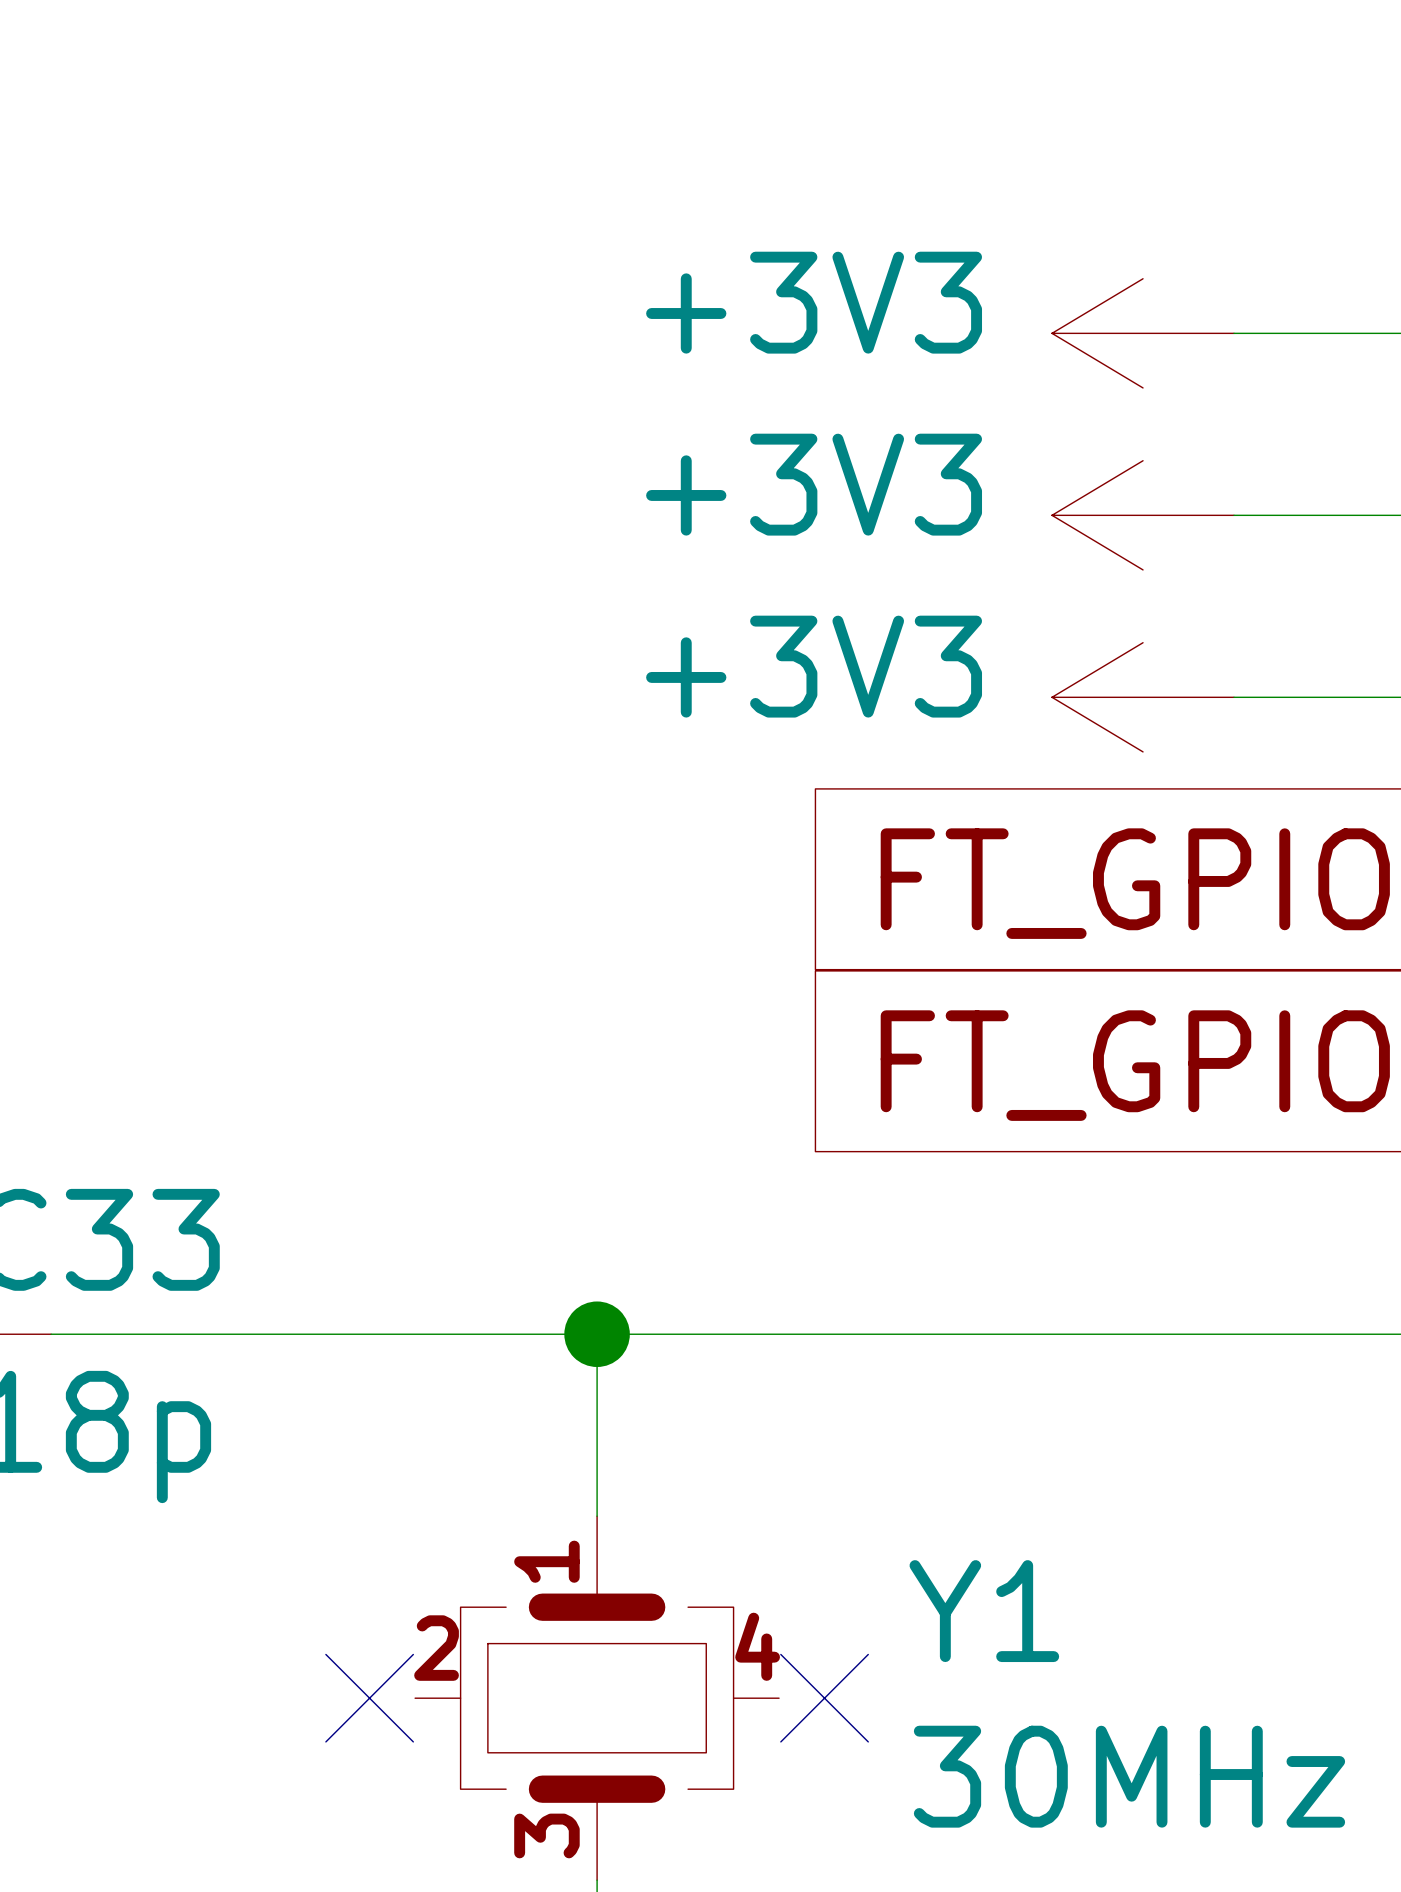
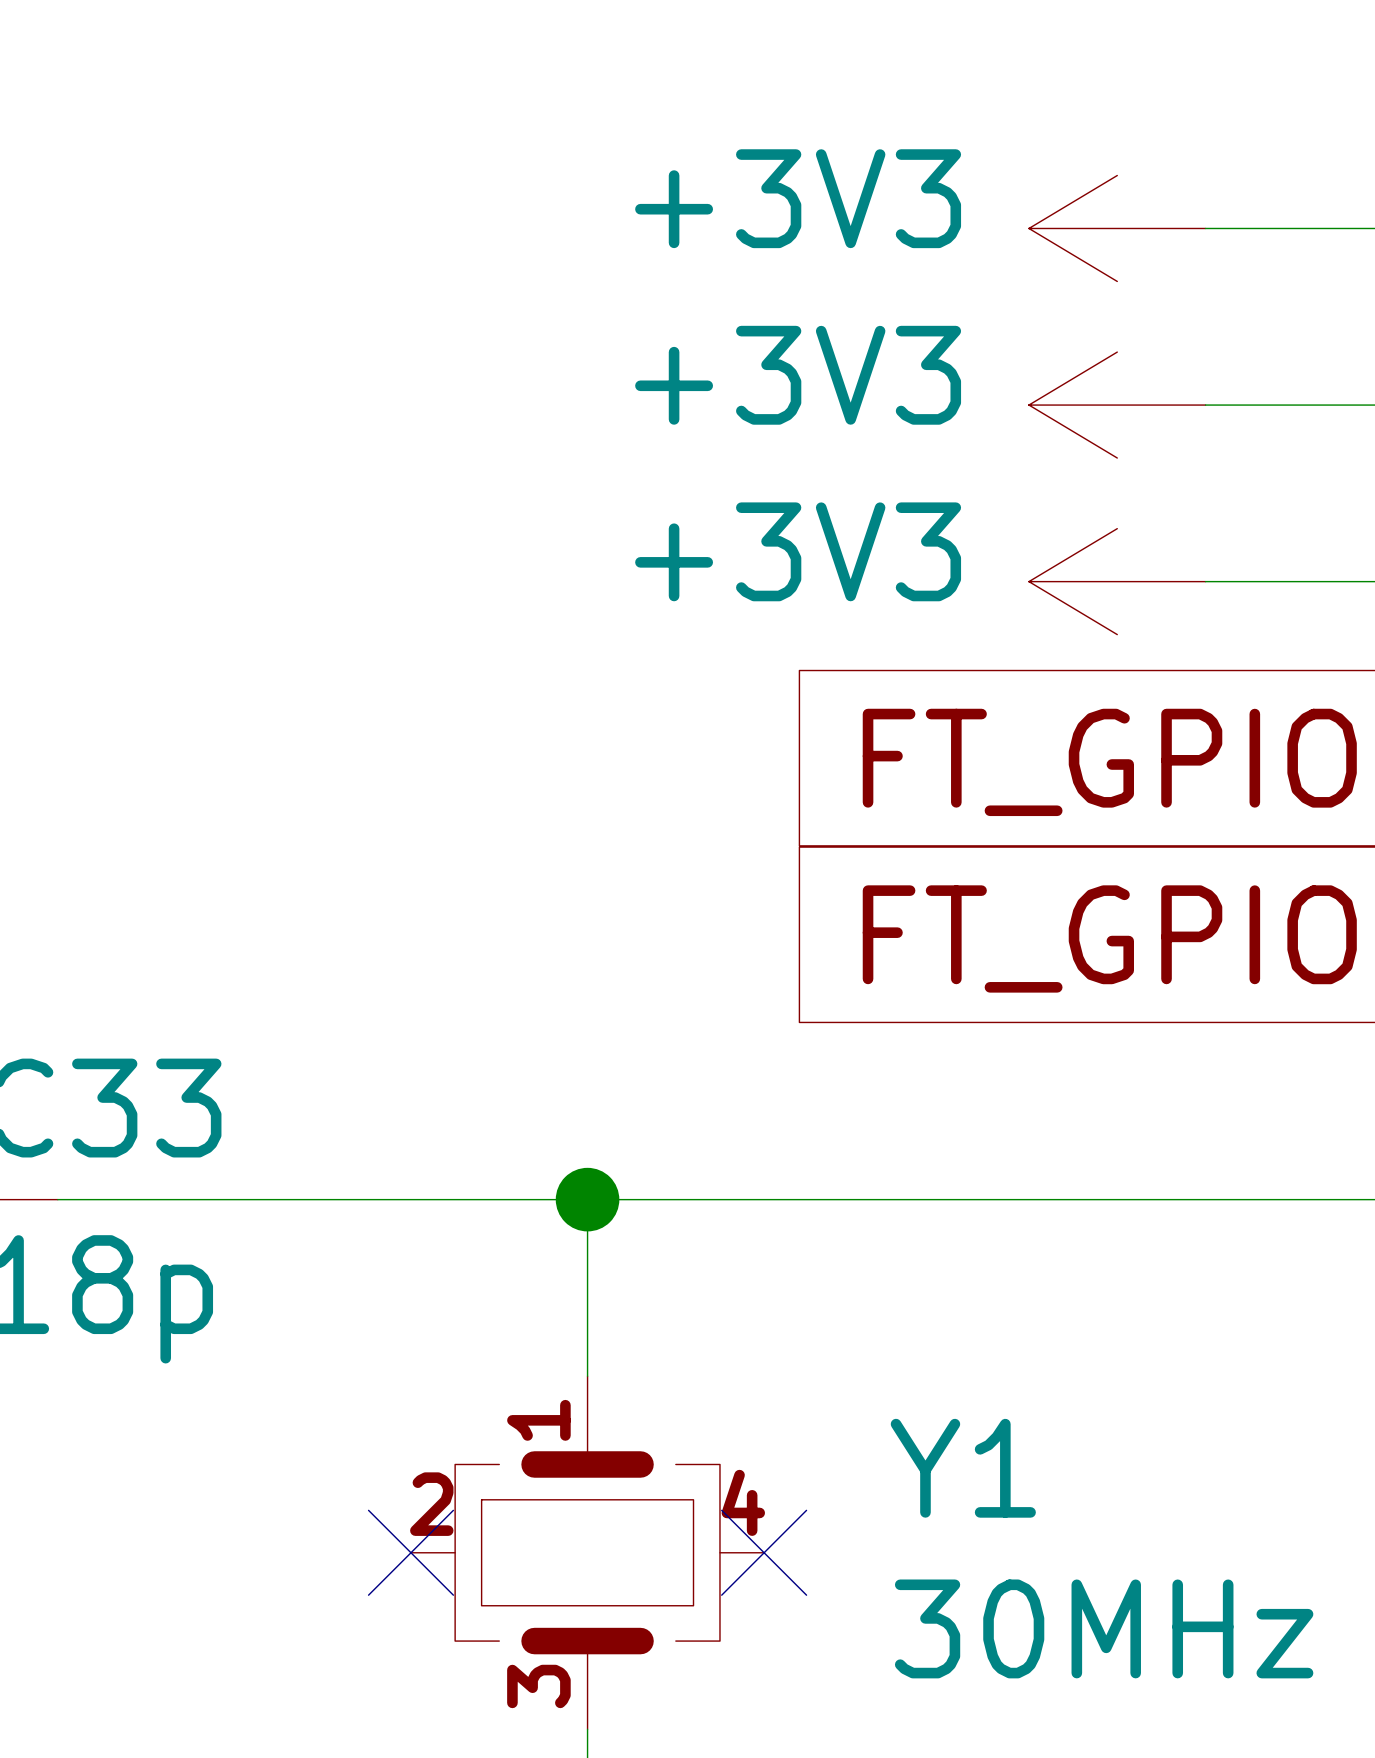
no-connect mark position: (369, 1698) -> (410, 1552)
no-connect mark position: (824, 1698) -> (764, 1552)

